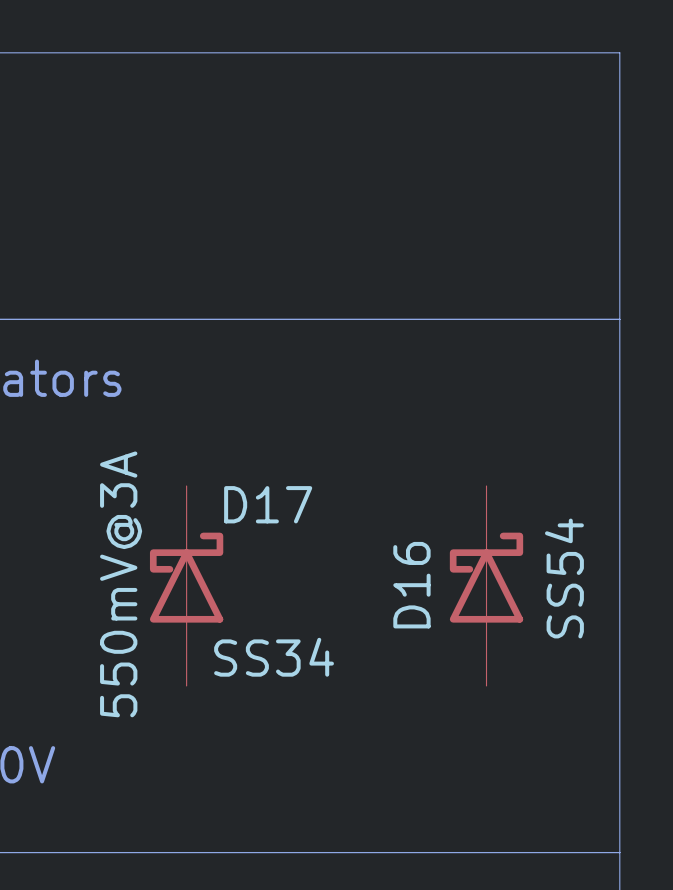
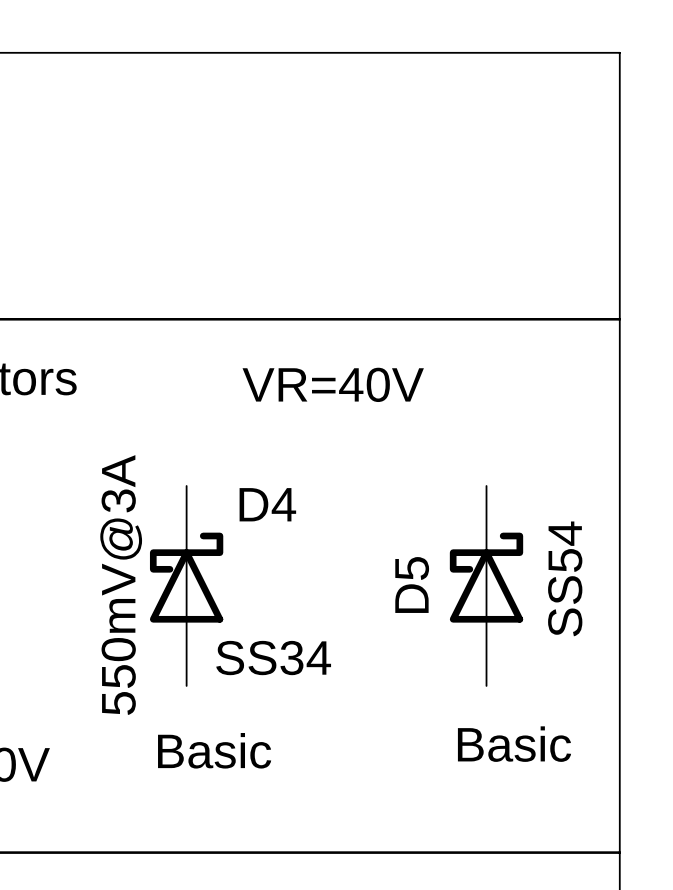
text: none -> VR=40V (333, 384)
D17 name: D17 (268, 504) -> D4 (267, 504)
D16 name: D16 (411, 585) -> D5 (412, 585)
text: none -> Basic (514, 744)
text: none -> Basic (214, 750)

